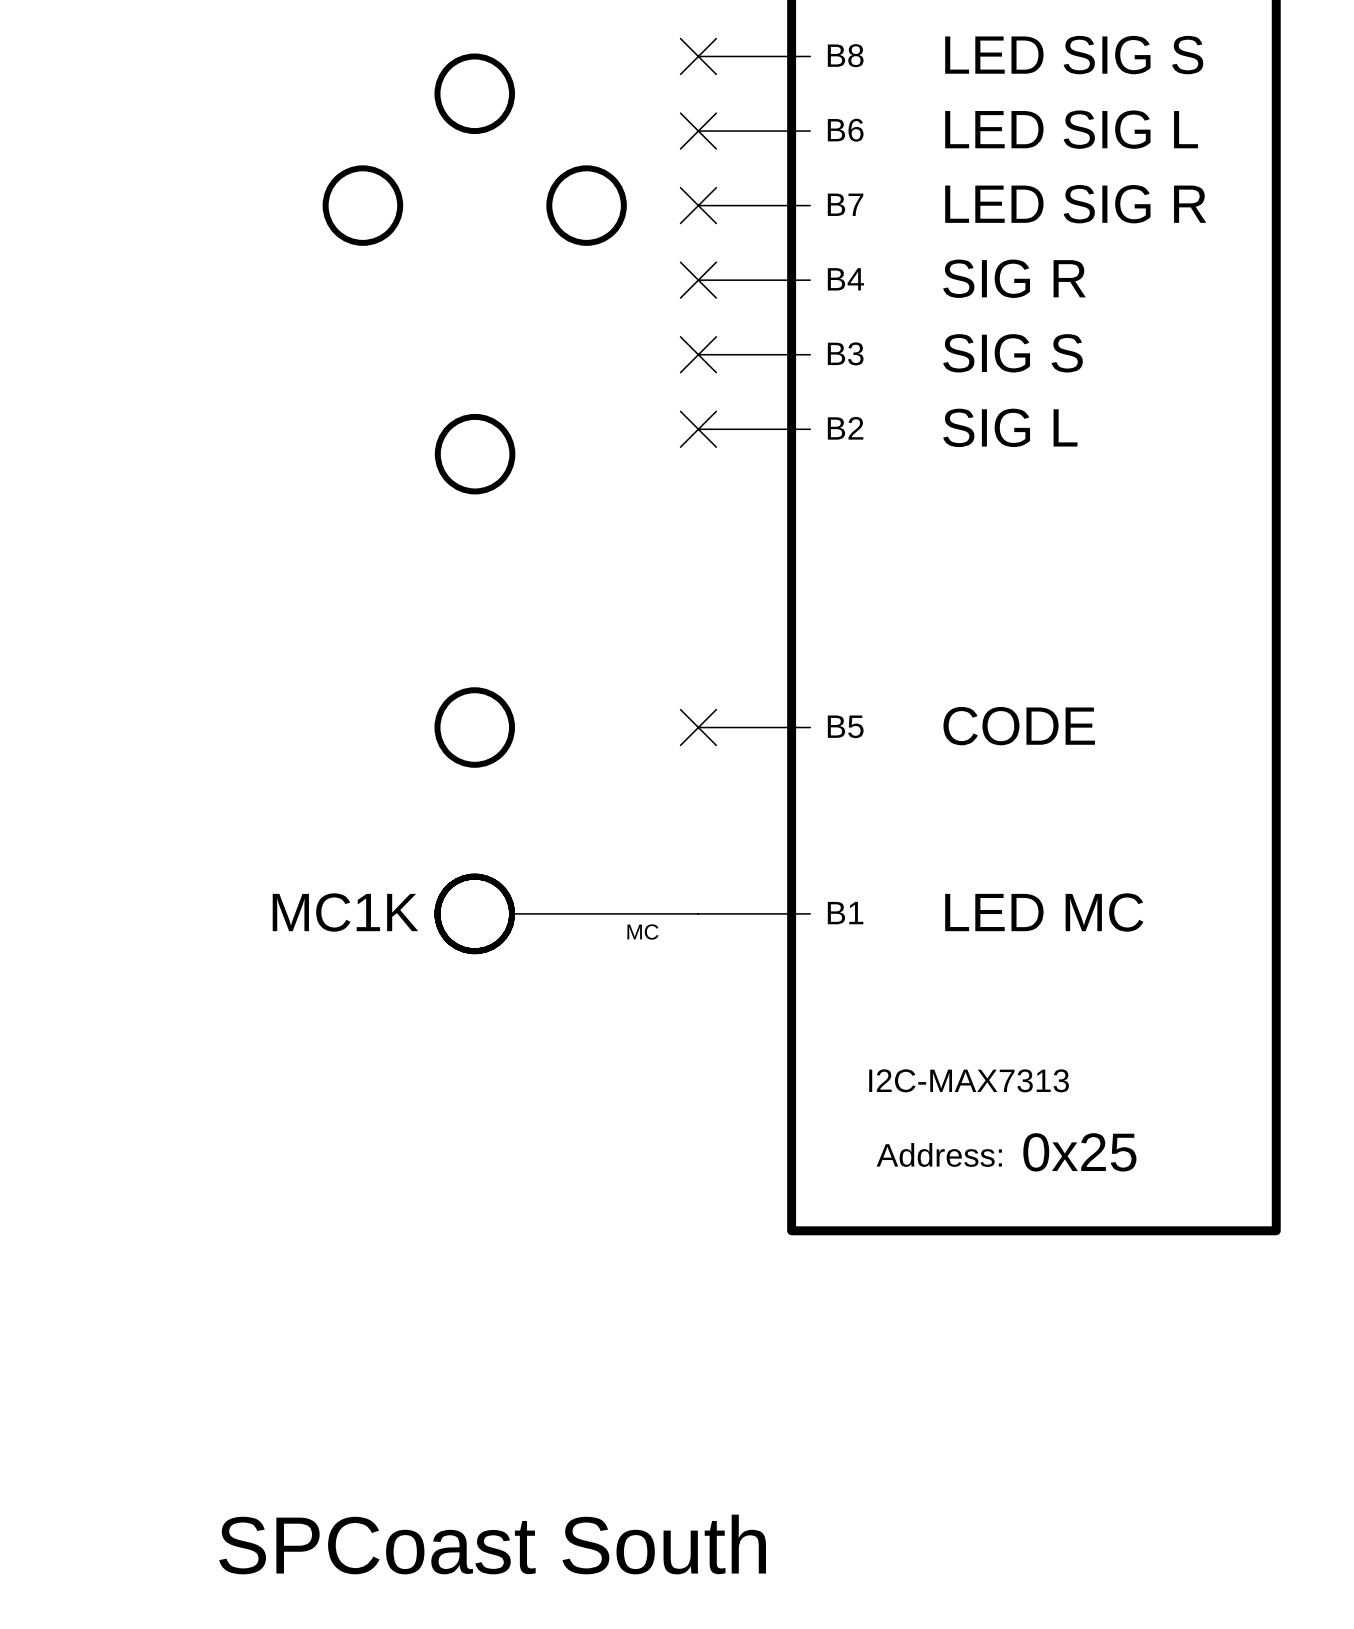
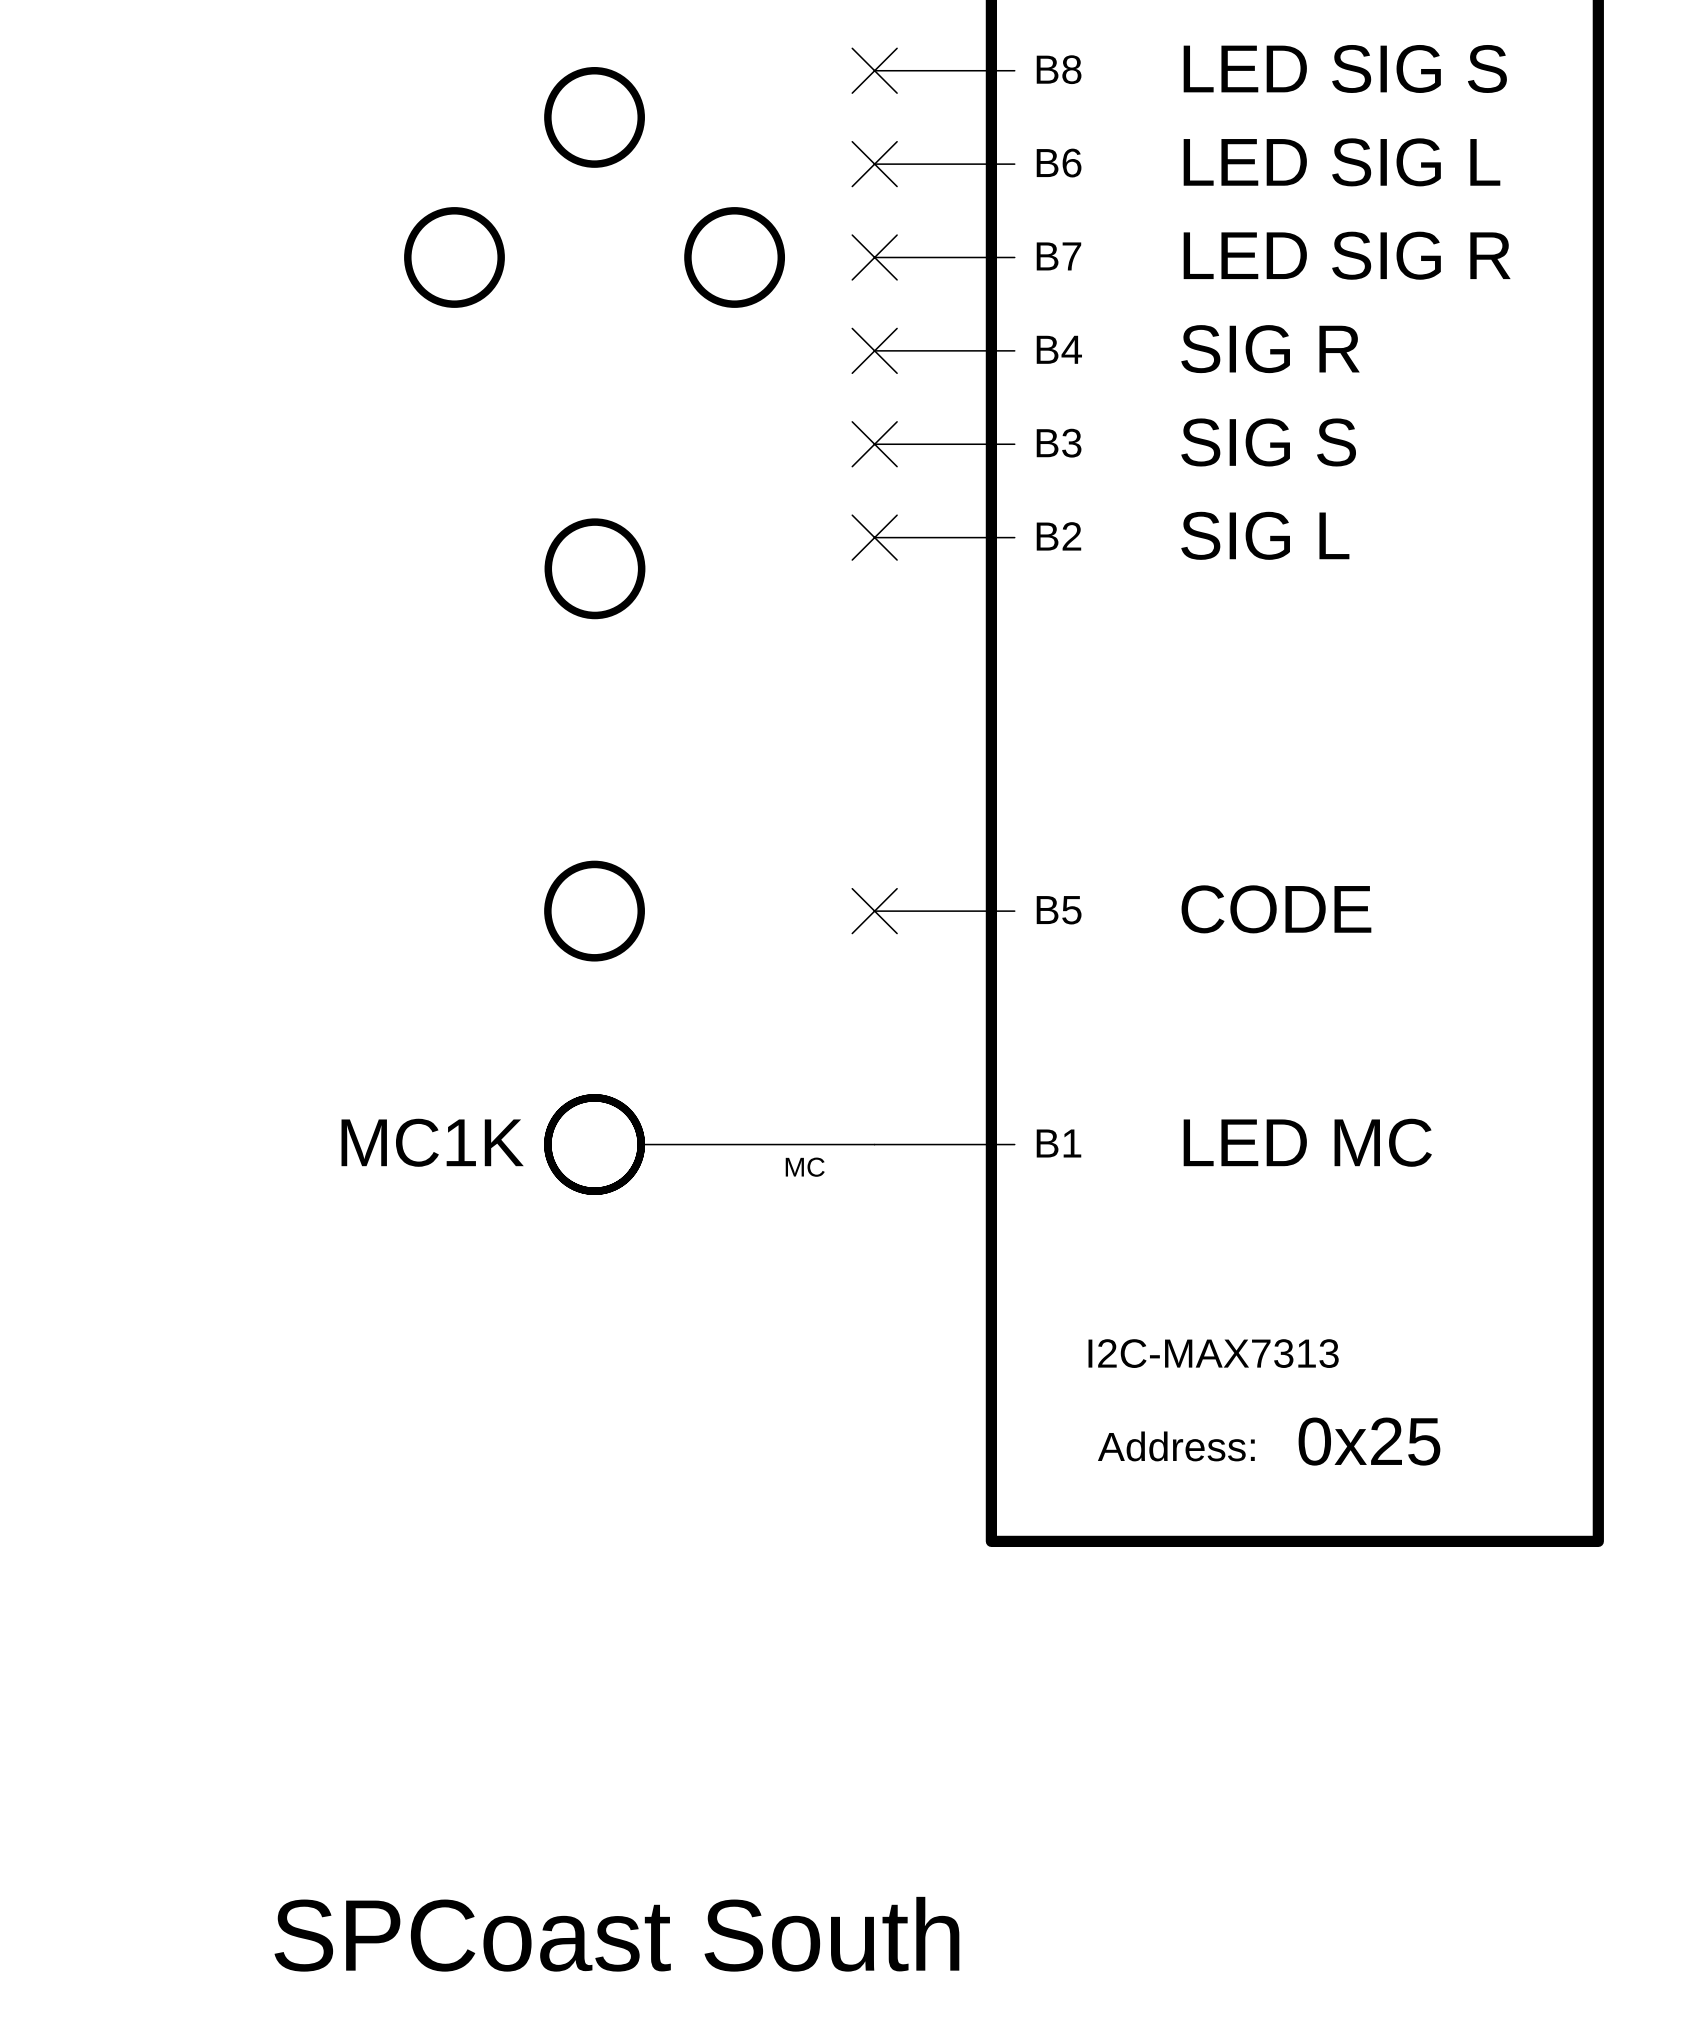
part text position: 0x25 (1079, 1152) -> 0x25 (1369, 1441)

